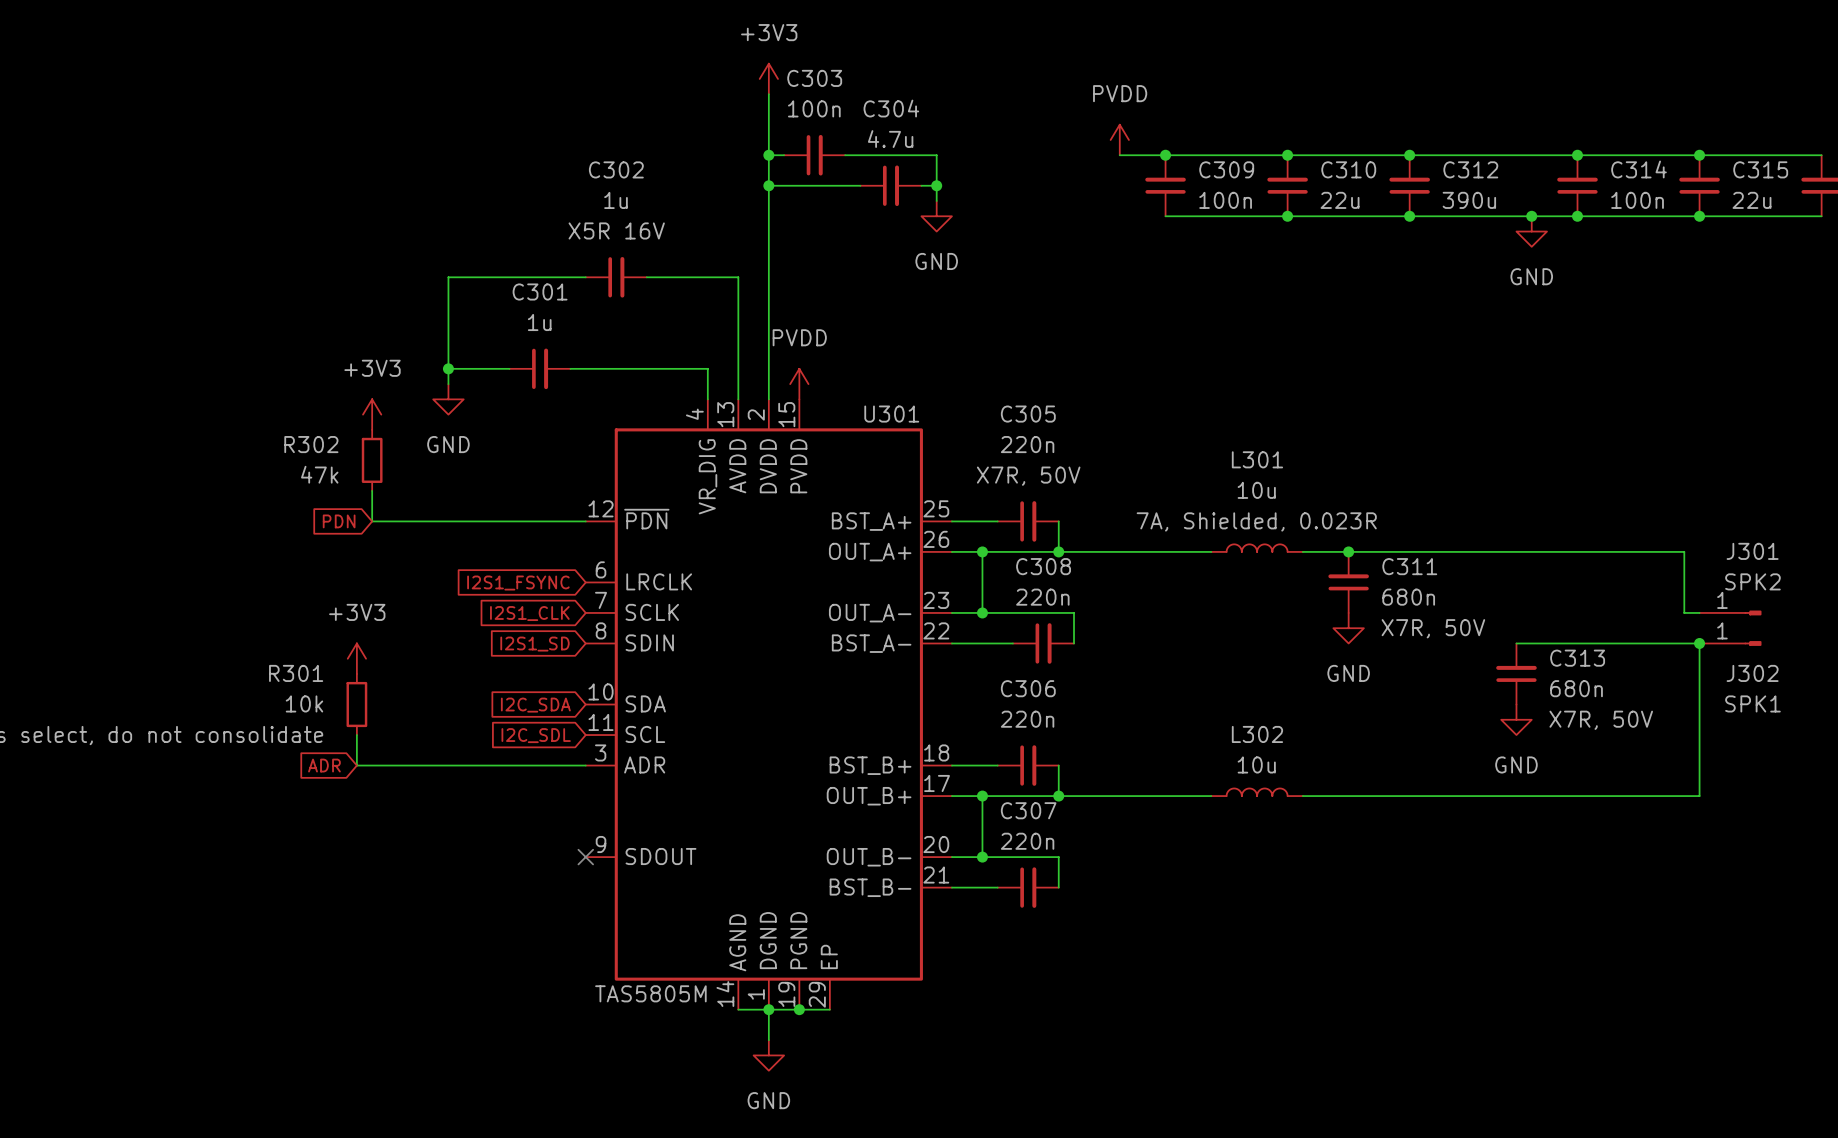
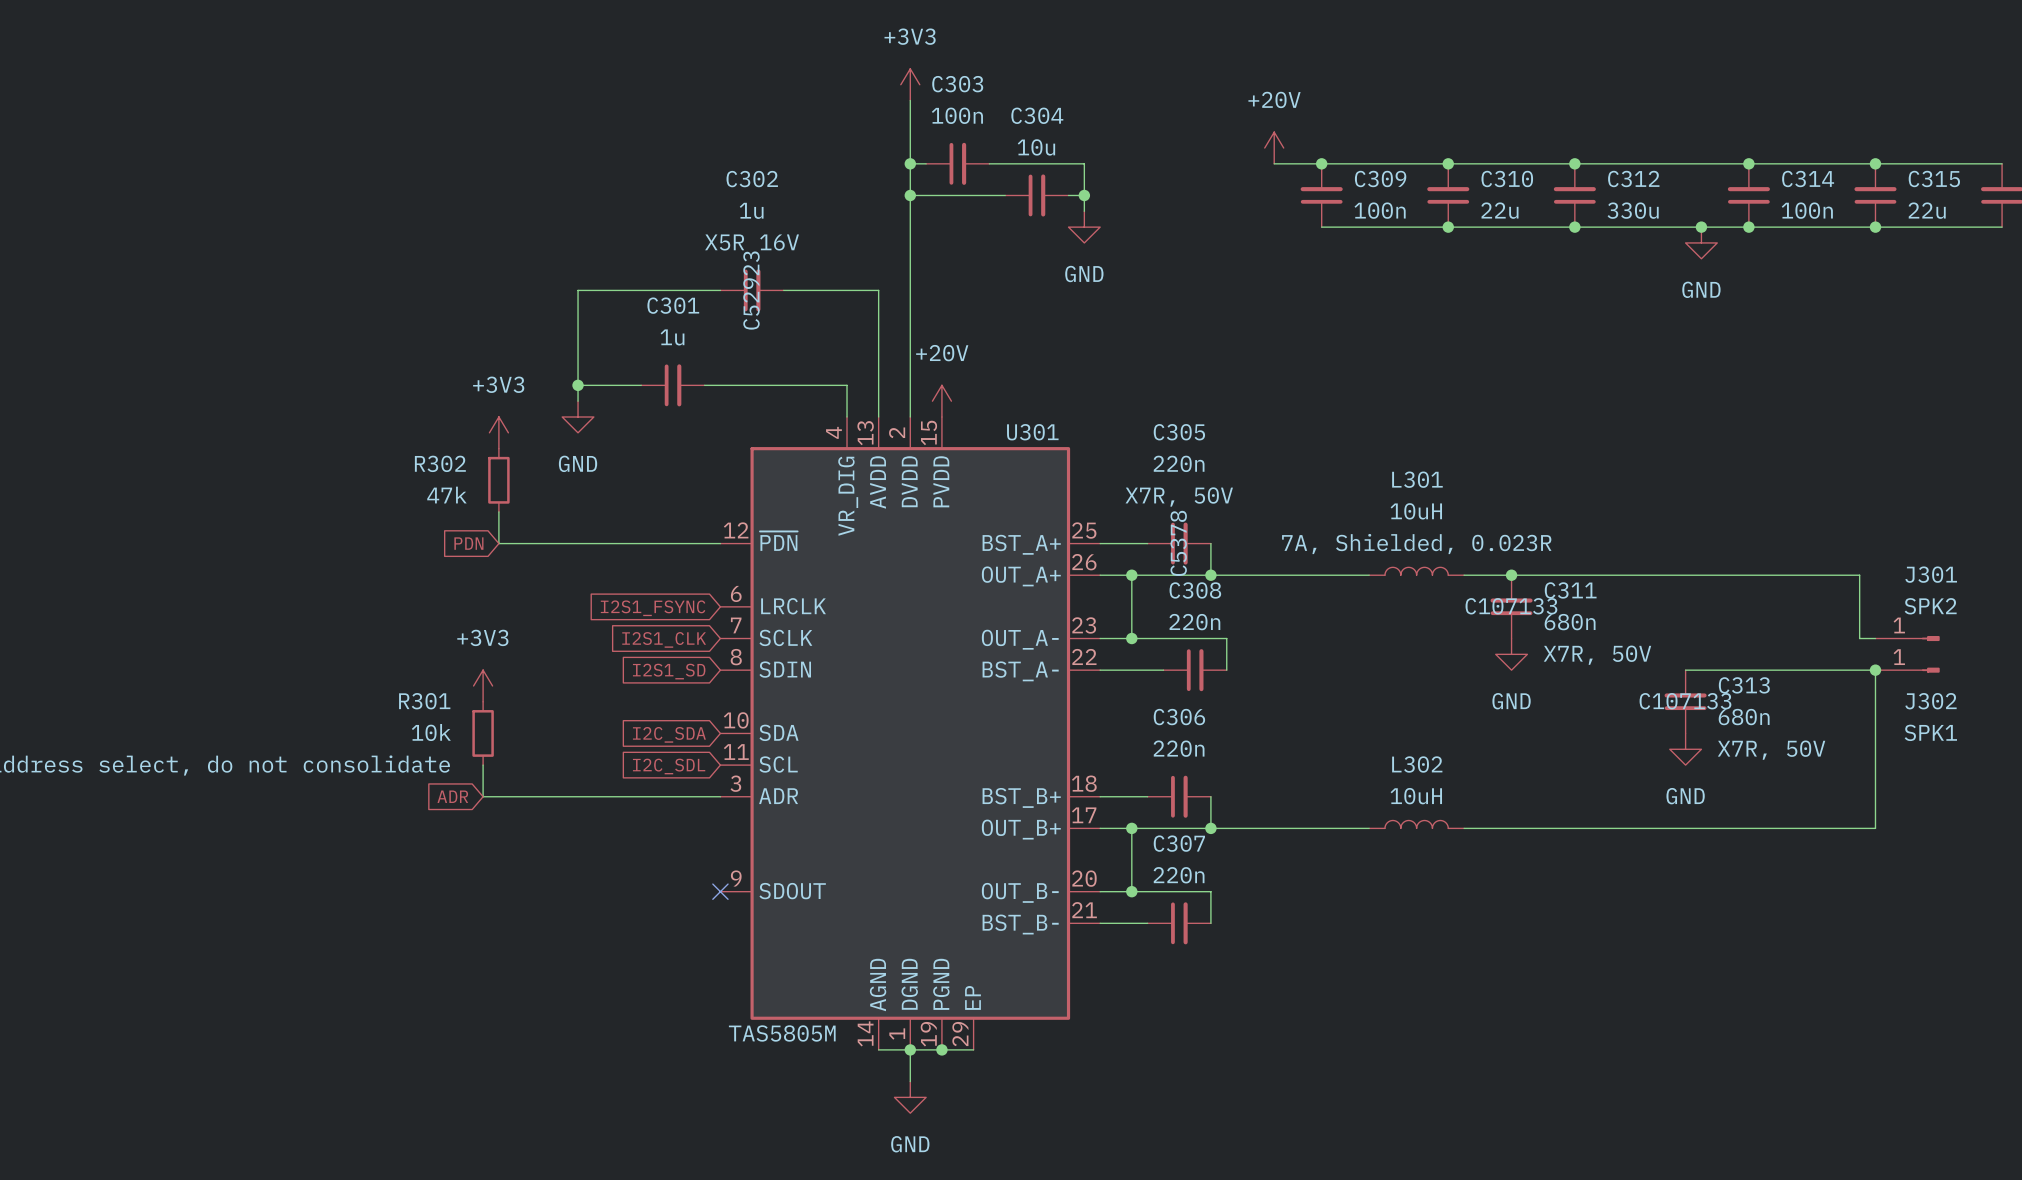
C304 value: 4.7u (890, 139) -> 10u (1036, 147)
power symbol: PVDD (1119, 139) -> +20V (1274, 148)
C312 value: 390u (1469, 200) -> 330u (1633, 210)
C302 text: none -> C52923 (751, 290)
power symbol: PVDD (799, 384) -> +20V (941, 401)
L301 value: 10u (1256, 490) -> 10uH (1416, 511)
C305 text: none -> C5378 (1178, 543)
C311 text: none -> C107133 (1511, 606)
C313 text: none -> C107133 (1685, 701)
L302 value: 10u (1256, 764) -> 10uH (1416, 796)

